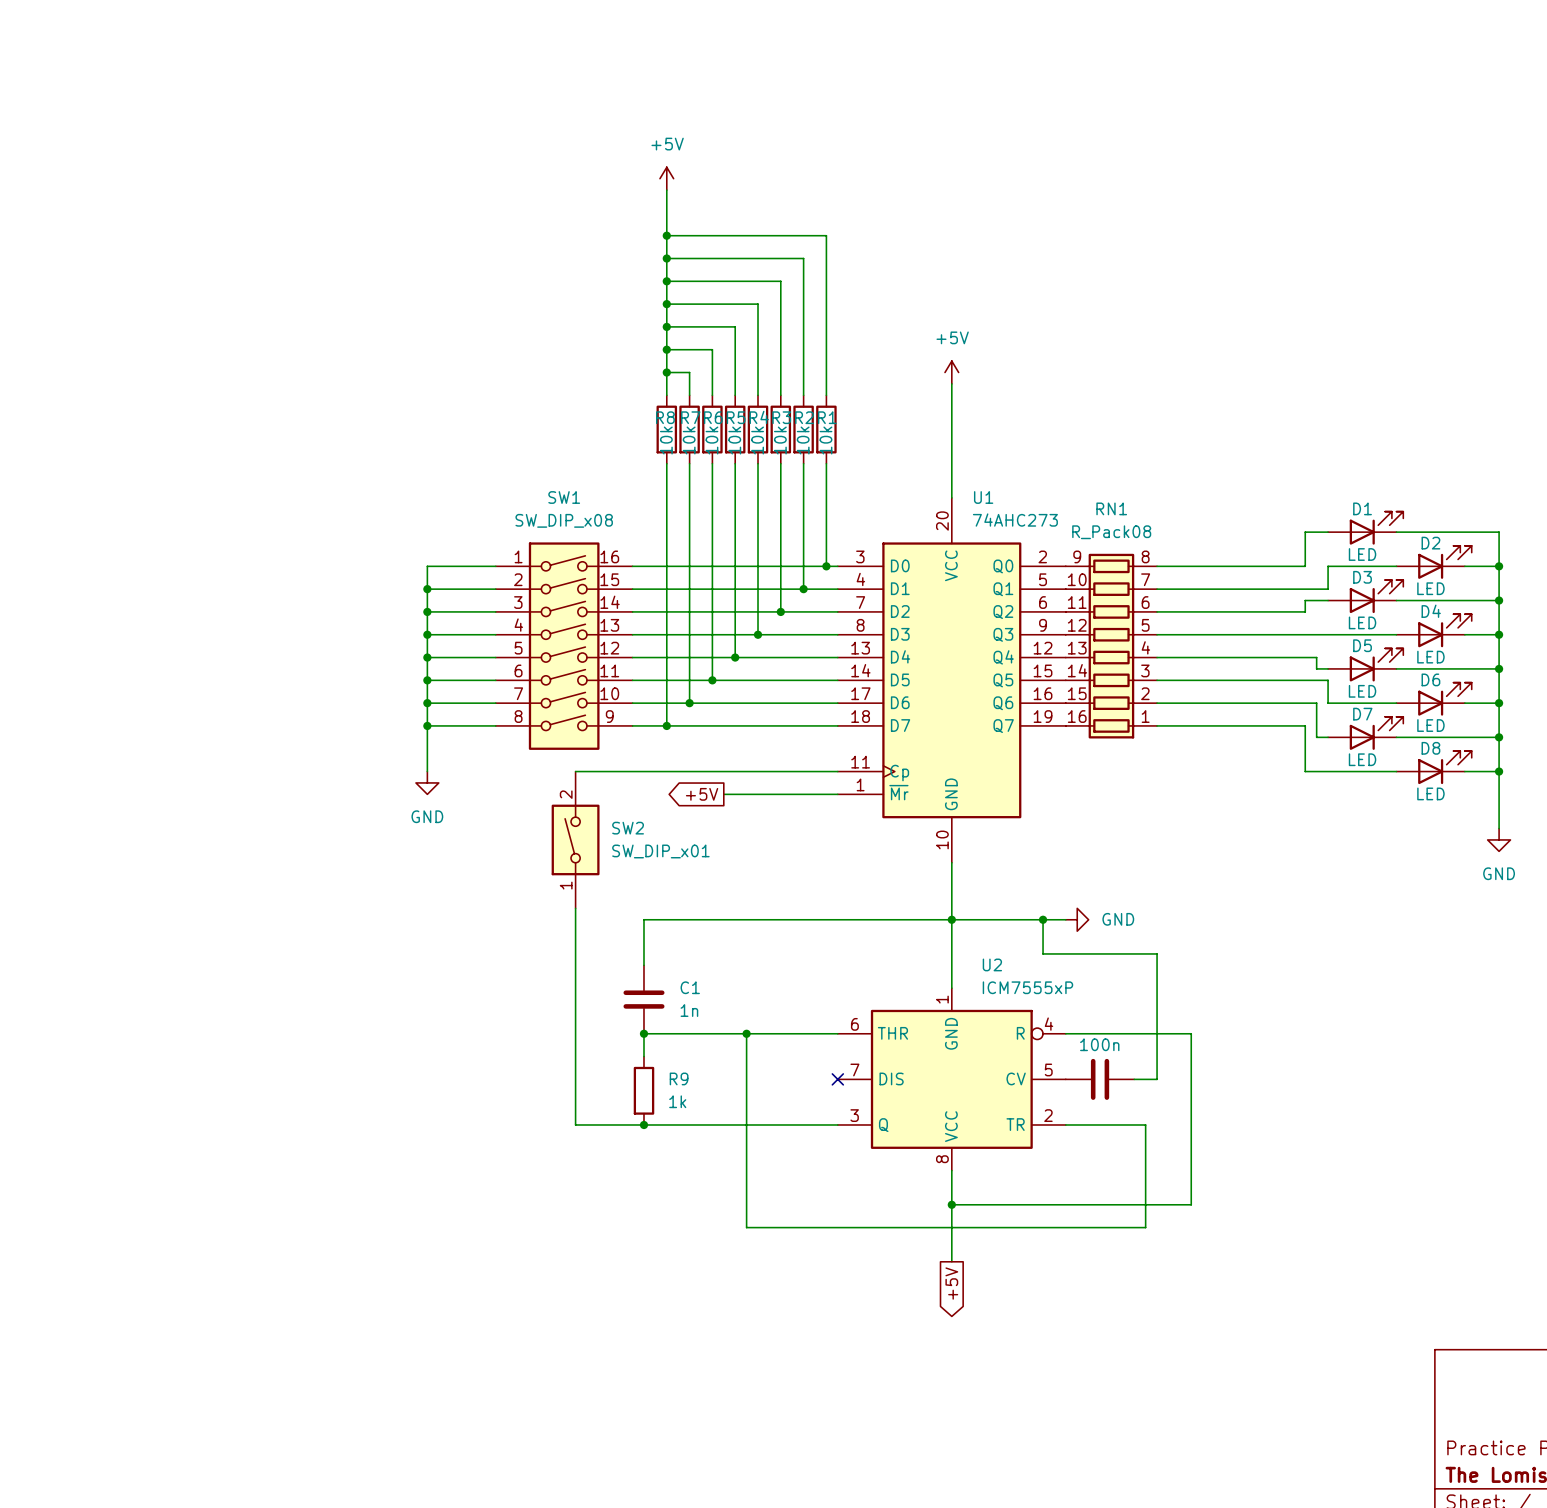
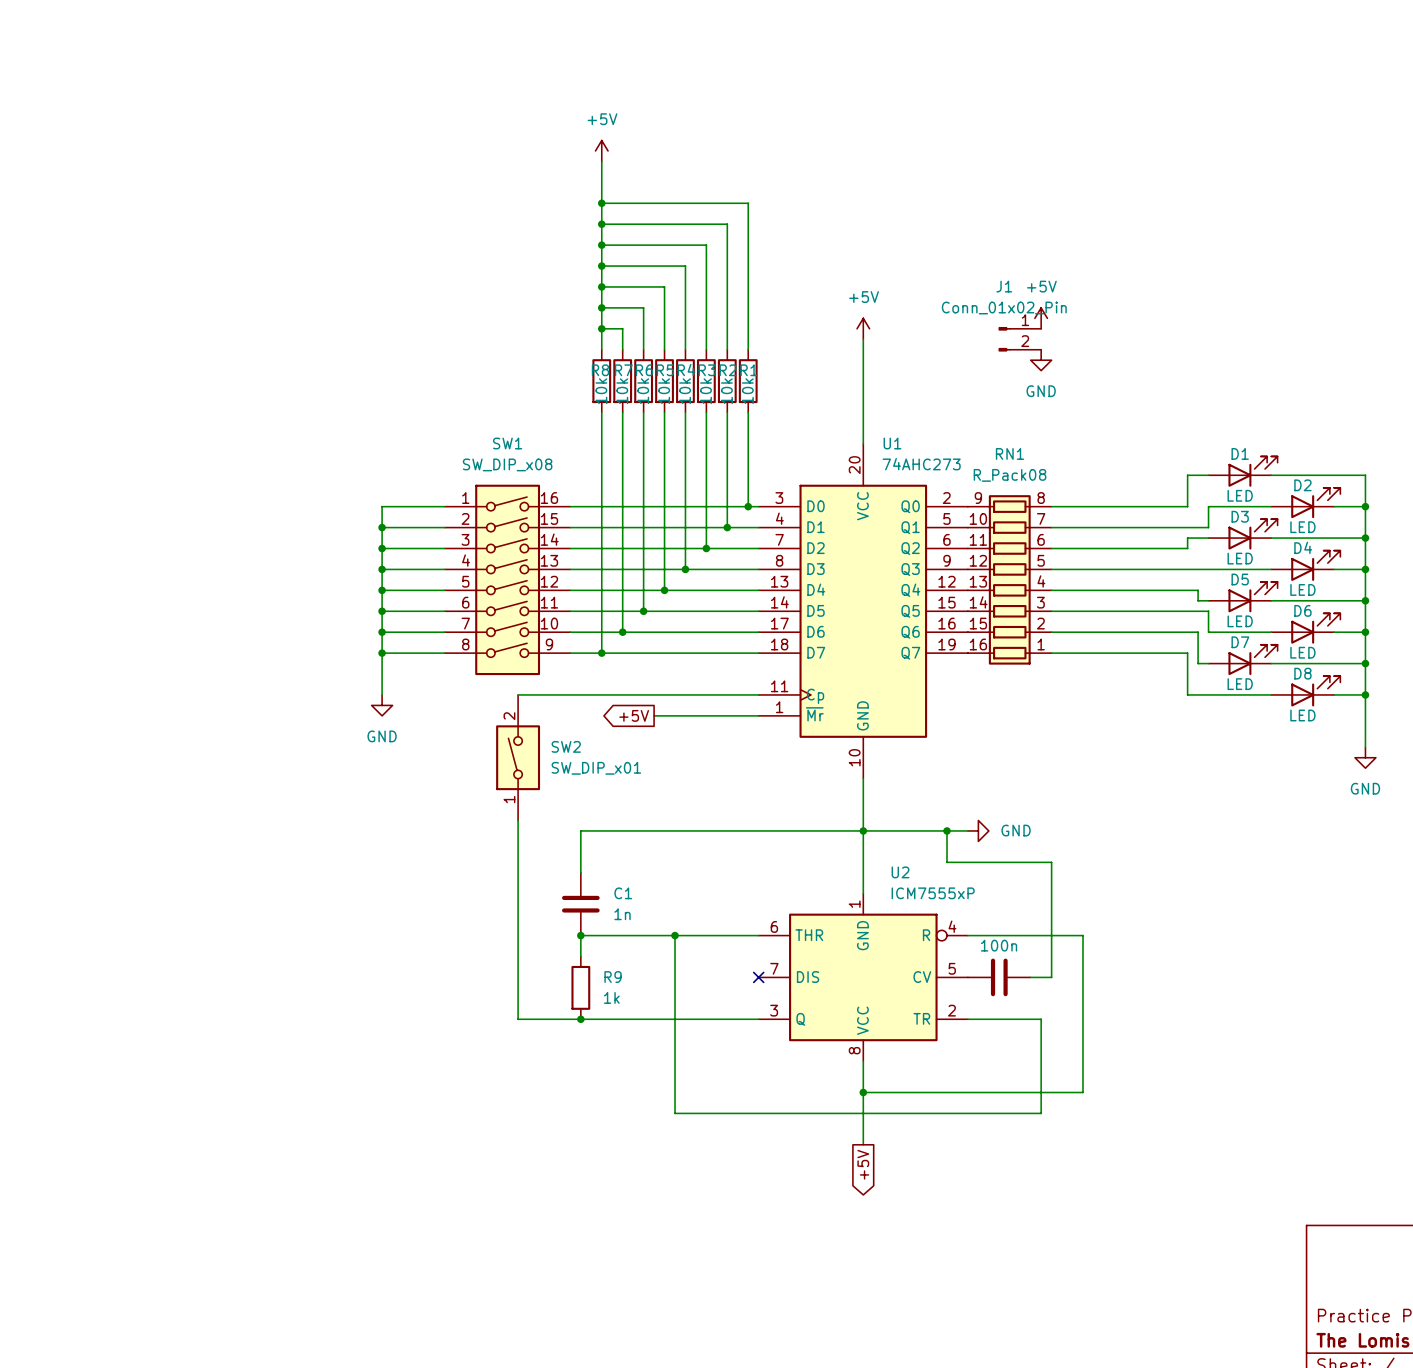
power symbol: none -> +5V (1041, 318)
J1: none -> Conn_01x02_Pin (1019, 339)
power symbol: none -> GND (1041, 360)

